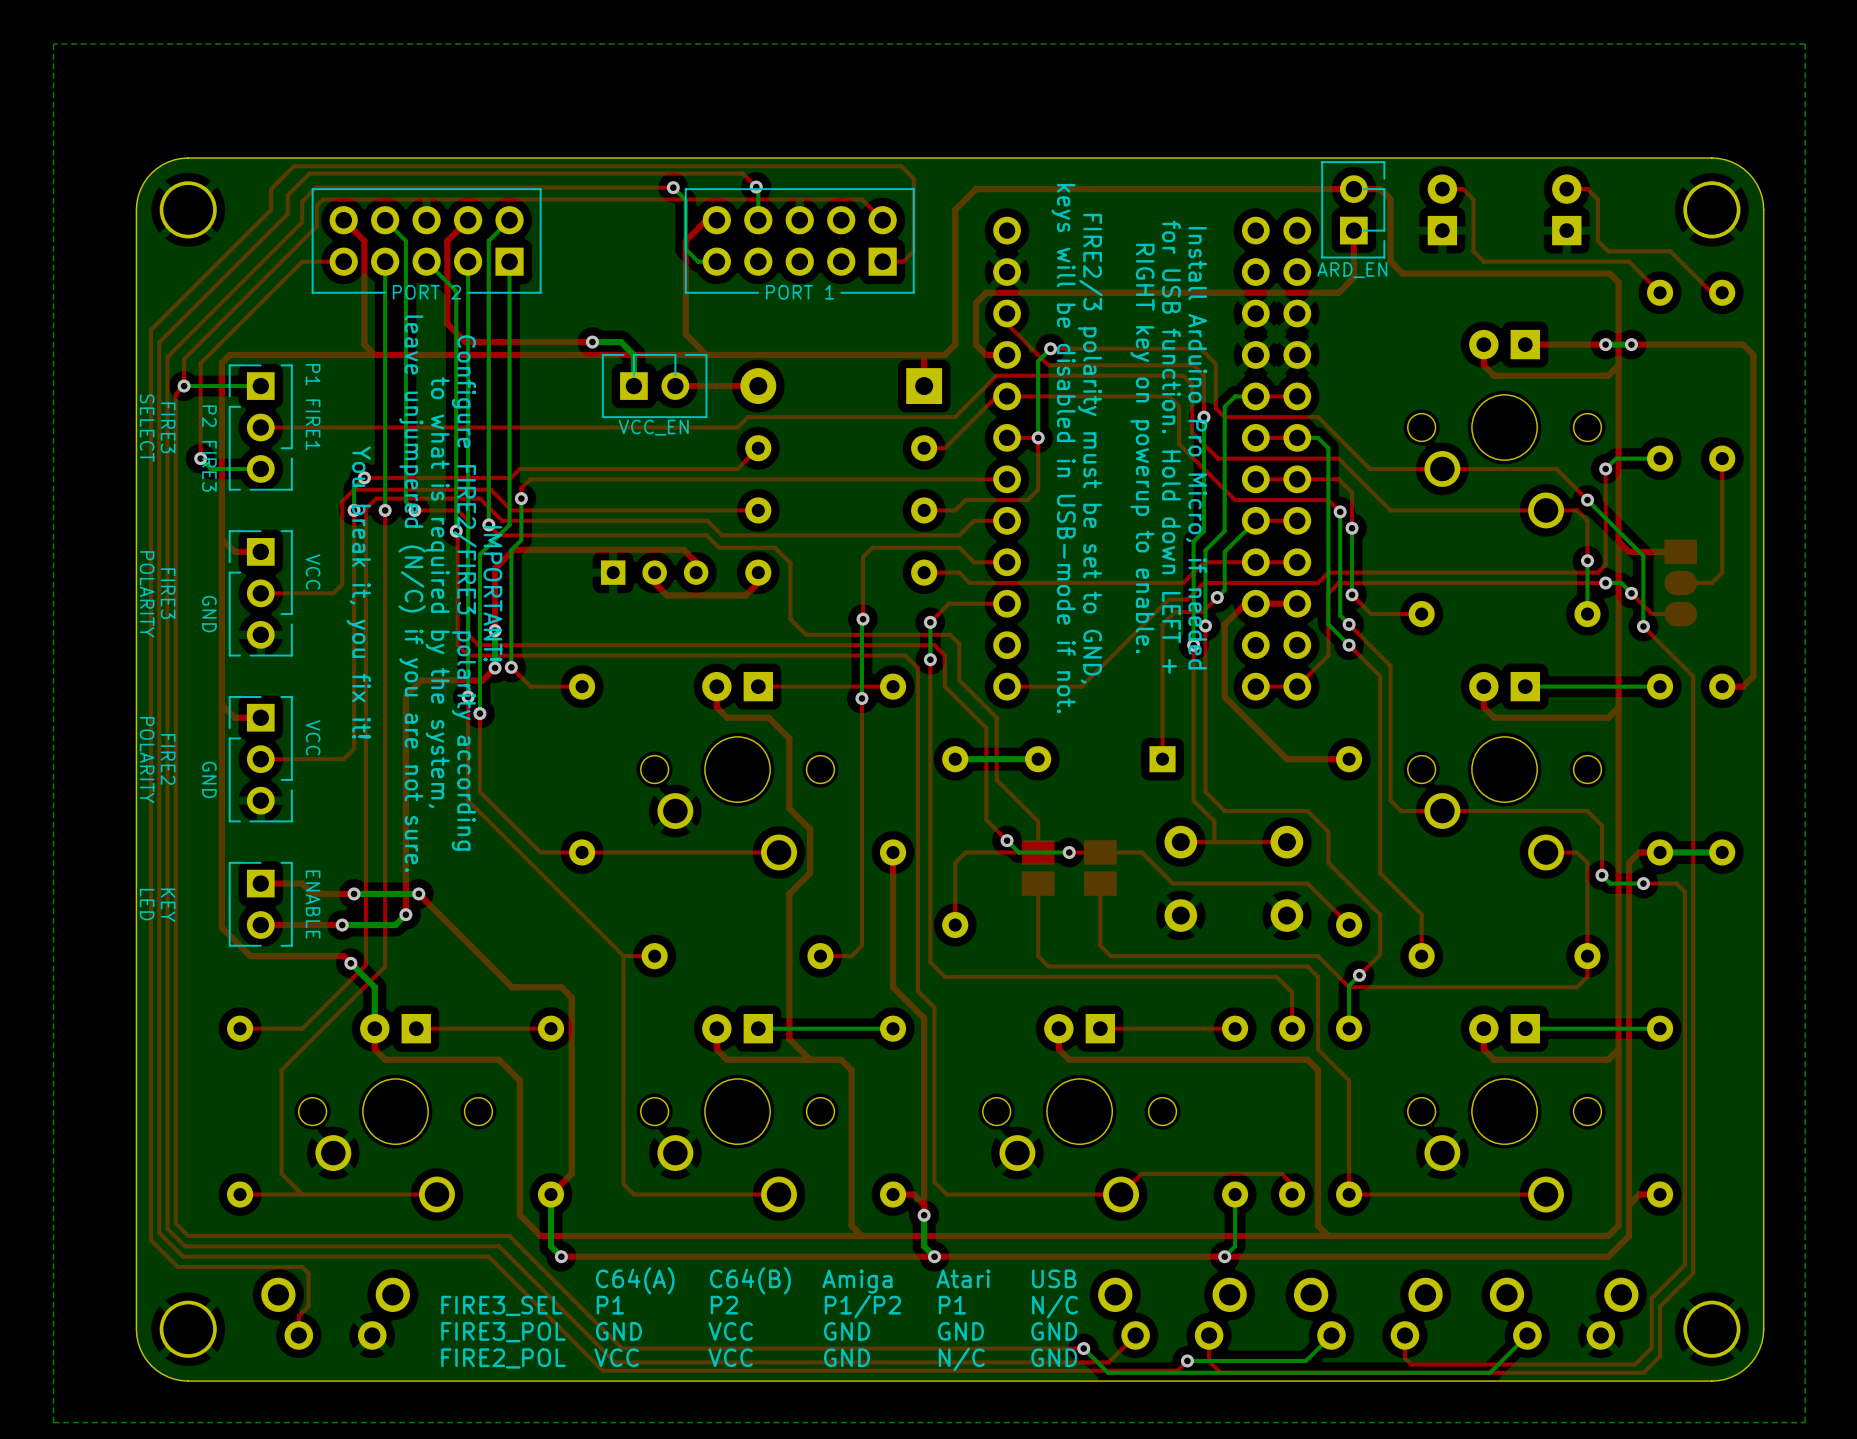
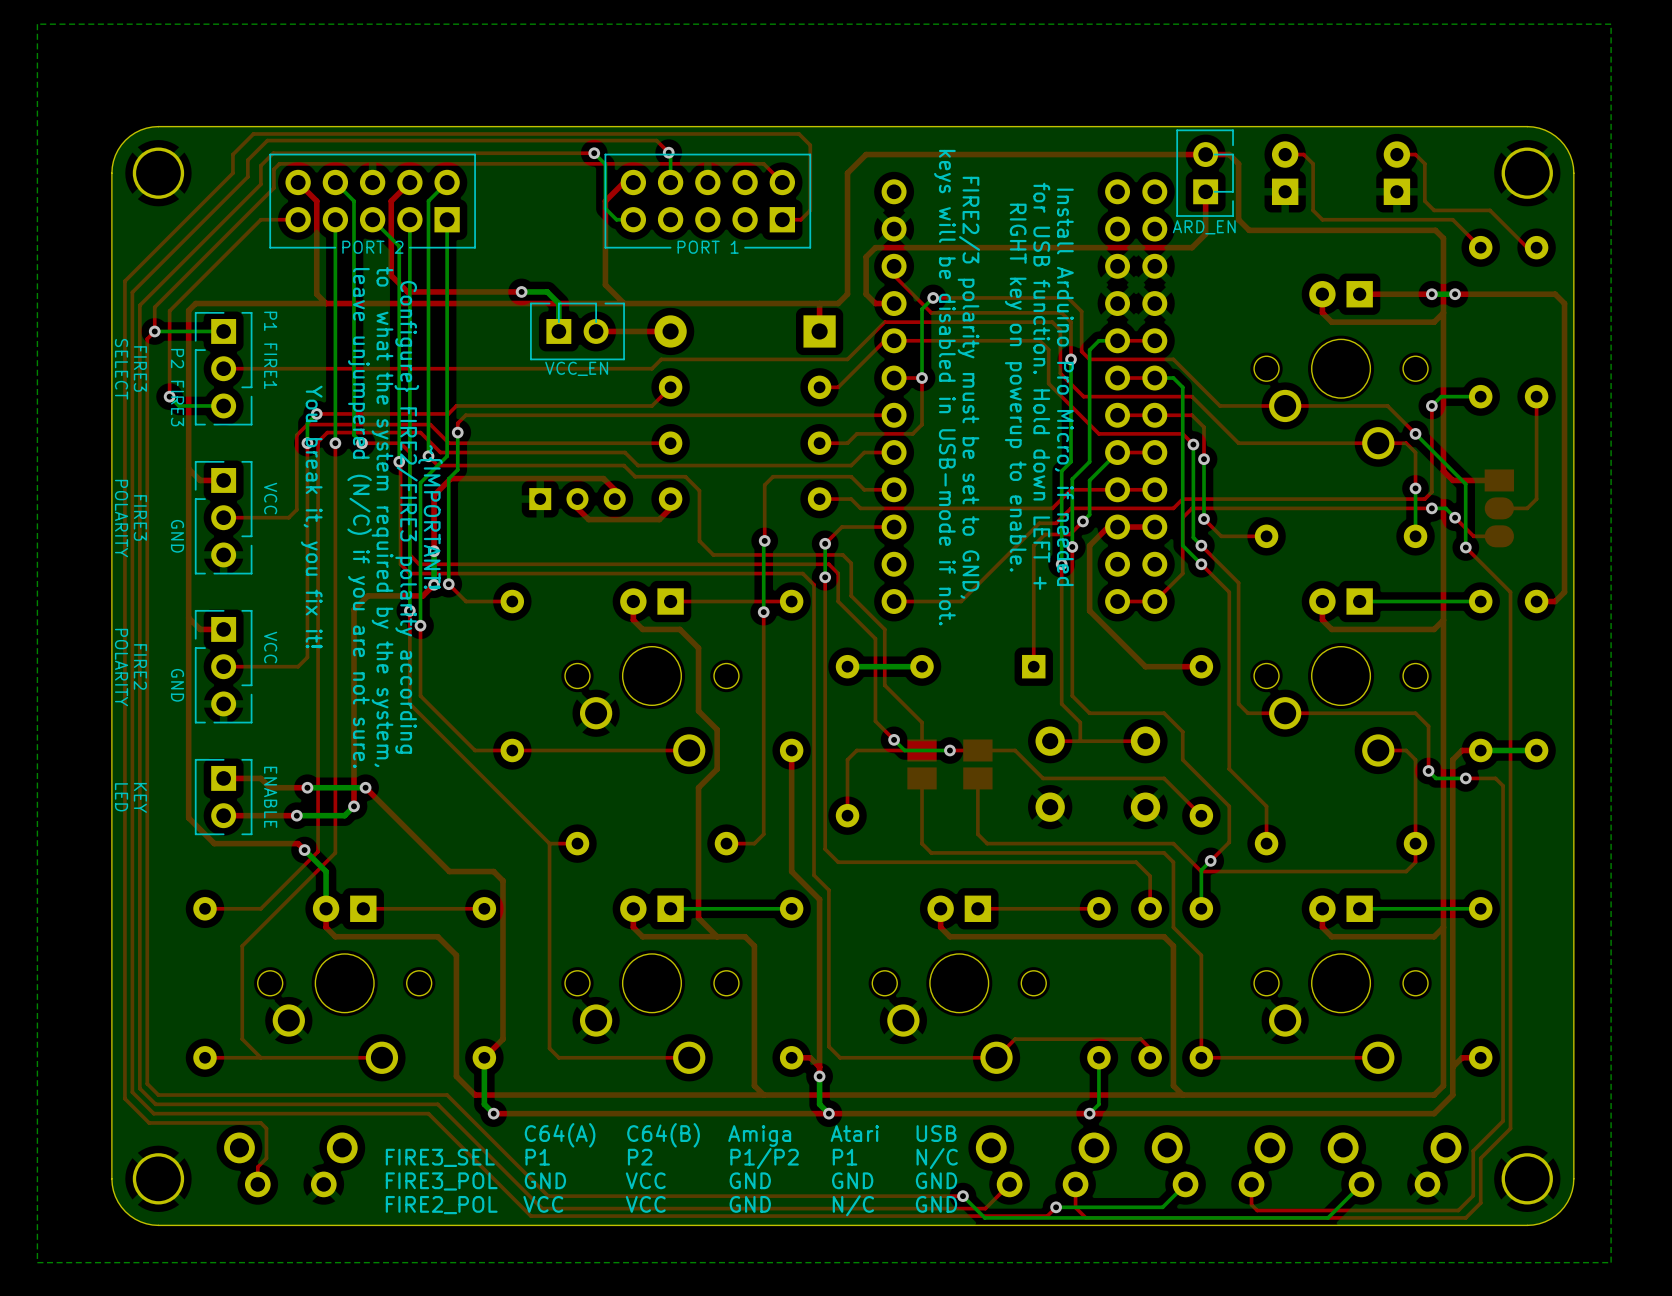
text: to what is required by the system, (437, 592) -> to what the system required by the system, (382, 517)
text: Configure FIRE2/FIRE3 polarity according (464, 592) -> Configure} FIRE2/FIRE3 polarity according (406, 517)
text: IMPORTANT! (492, 593) -> ~{IMPORTANT! (430, 517)

